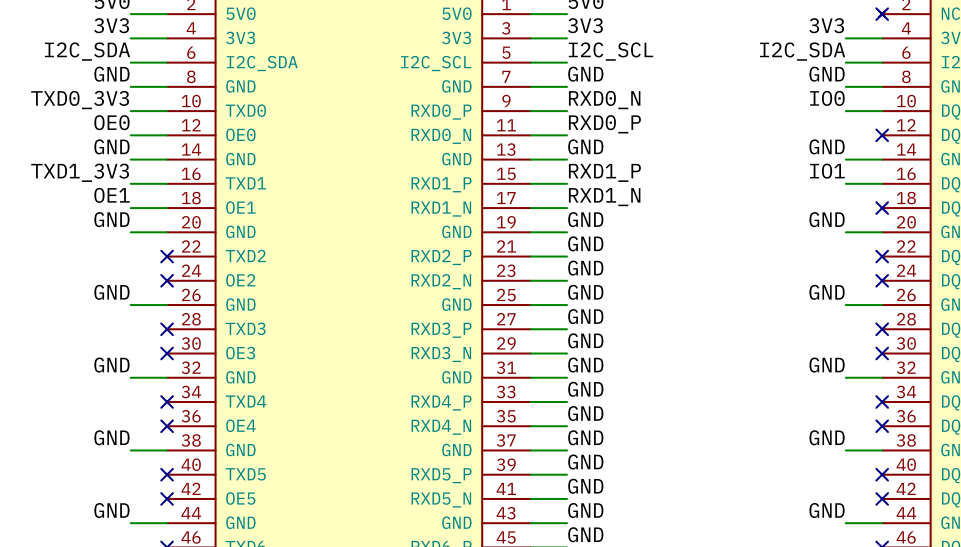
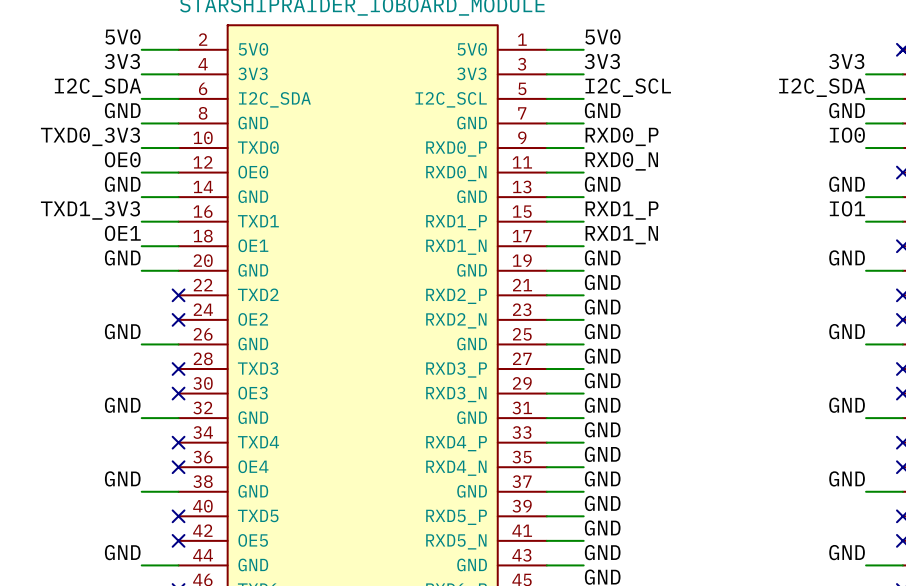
label: RXD0_N (604, 100) -> RXD0_P (622, 136)
label: RXD0_P (604, 124) -> RXD0_N (621, 161)

